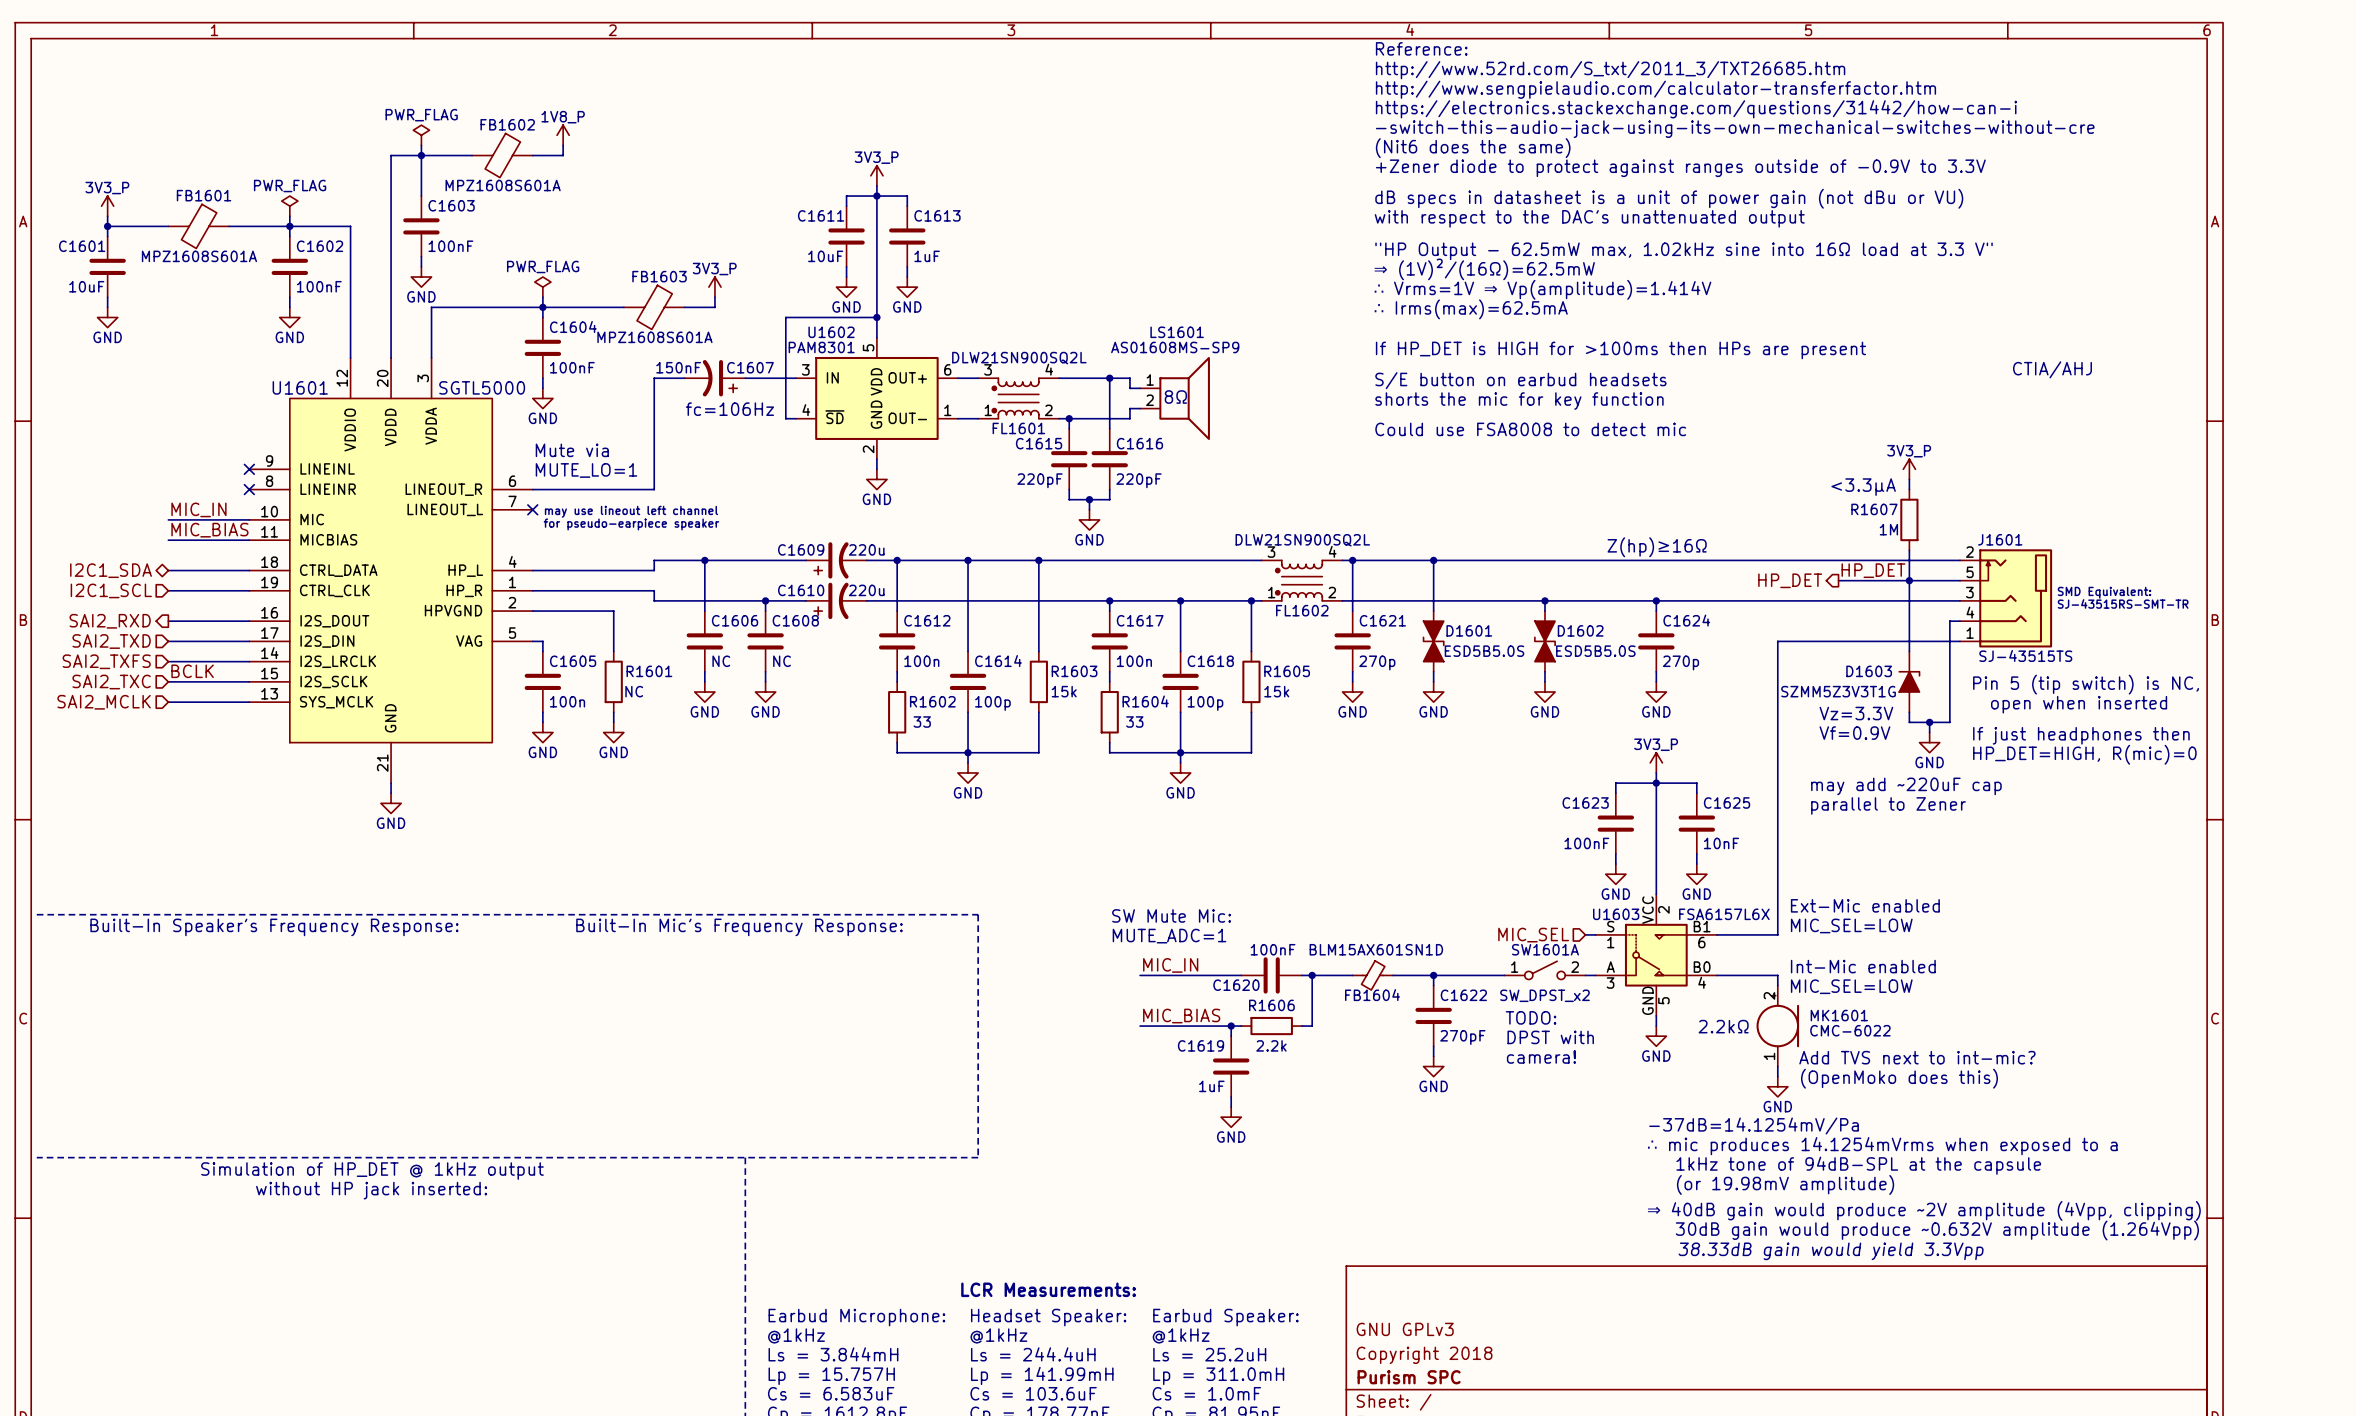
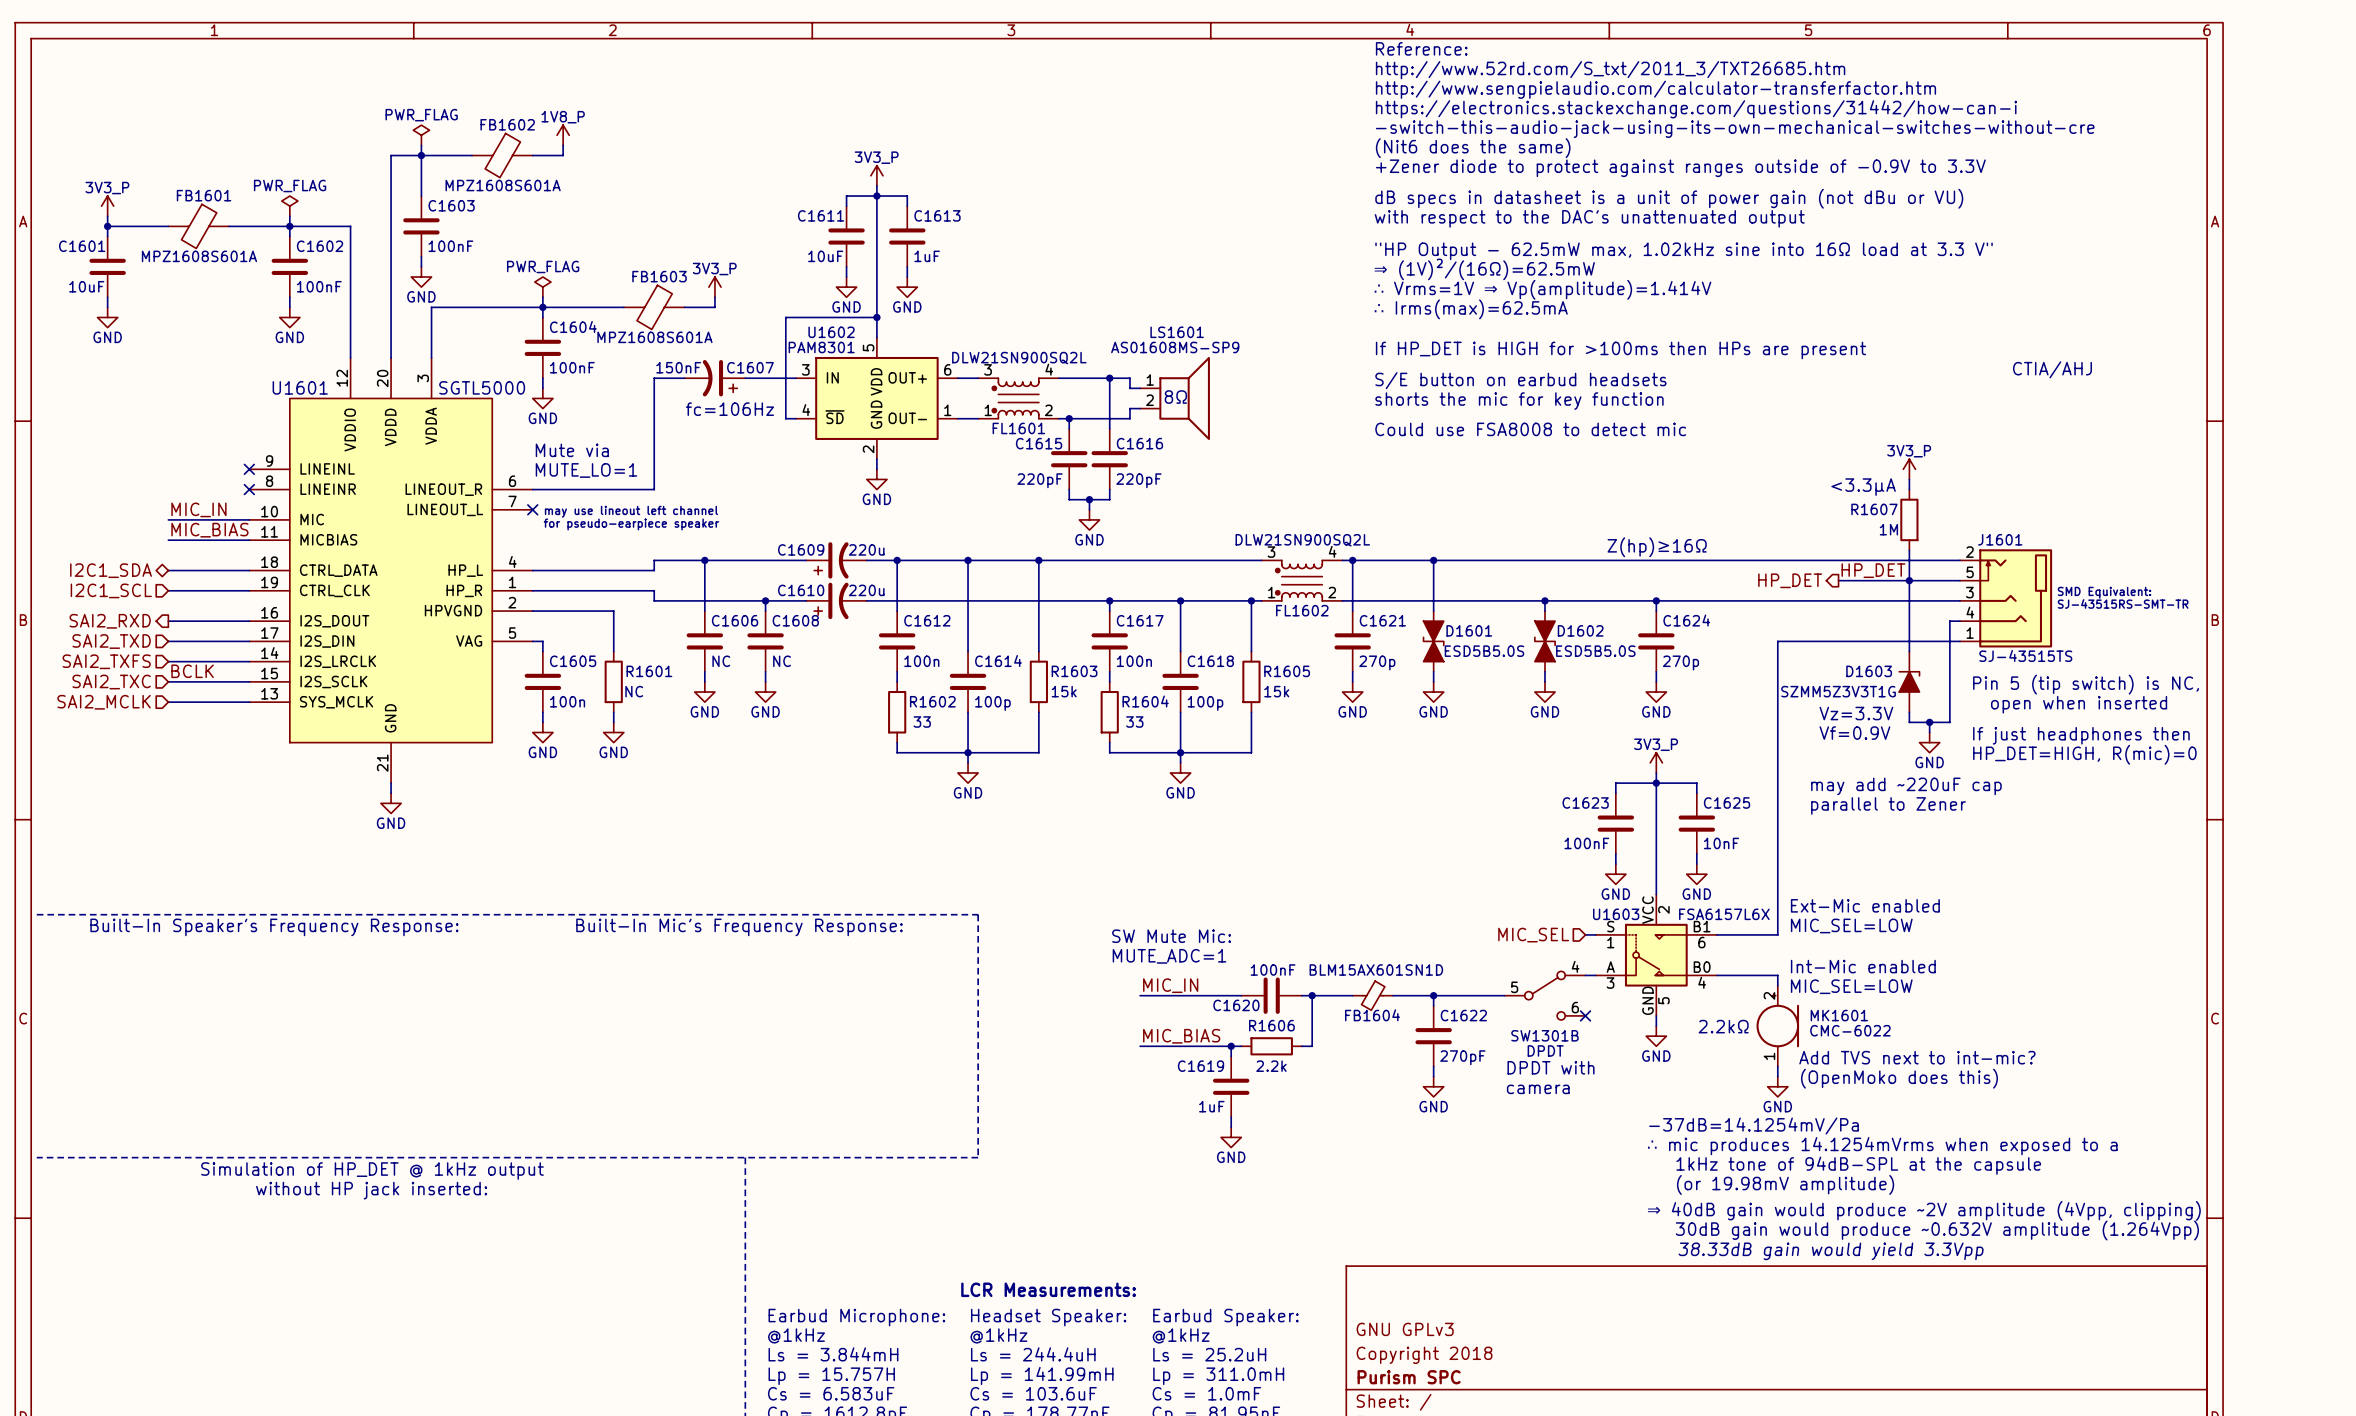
text: SW Mute Mic: (1171, 915) -> none
text: MUTE_ADC=1 (1169, 936) -> SW Mute Mic: (1171, 936)
text: none -> MUTE_ADC=1 (1169, 956)
label position: MIC_IN (1170, 965) -> MIC_IN (1170, 985)
SW1601A: SW_DPST_x2 (1544, 970) -> none
wire: (1140, 975) (1241, 975) -> (1140, 995) (1241, 995)
C1620 position: (1271, 975) -> (1271, 995)
wire: (1302, 975) (1352, 975) -> (1302, 995) (1352, 995)
wire: (1312, 975) (1312, 995) -> none
junction position: (1312, 975) -> (1312, 995)
FB1604 position: (1372, 975) -> (1372, 995)
wire: (1393, 975) (1504, 975) -> (1393, 995) (1504, 995)
junction position: (1433, 975) -> (1433, 995)
SW1301B: none -> DPDT (1544, 995)
C1622 position: (1433, 1015) -> (1433, 1036)
no-connect mark: none -> (1585, 1015)
label position: MIC_BIAS (1181, 1016) -> MIC_BIAS (1181, 1036)
text: TODO: (1531, 1017) -> none
wire: (1140, 1026) (1241, 1026) -> (1140, 1046) (1241, 1046)
junction position: (1231, 1026) -> (1231, 1046)
R1606 position: (1271, 1026) -> (1271, 1046)
wire: (1302, 1026) (1312, 1026) -> (1302, 1046) (1312, 1046) (1312, 1026)
text: DPST with (1550, 1037) -> none
text: camera! (1541, 1056) -> none
C1619 position: (1231, 1066) -> (1231, 1086)
power symbol position: GND (1433, 1066) -> GND (1433, 1086)
text: none -> DPDT with (1550, 1067)
text: none -> camera (1538, 1089)
power symbol position: GND (1231, 1117) -> GND (1231, 1137)

